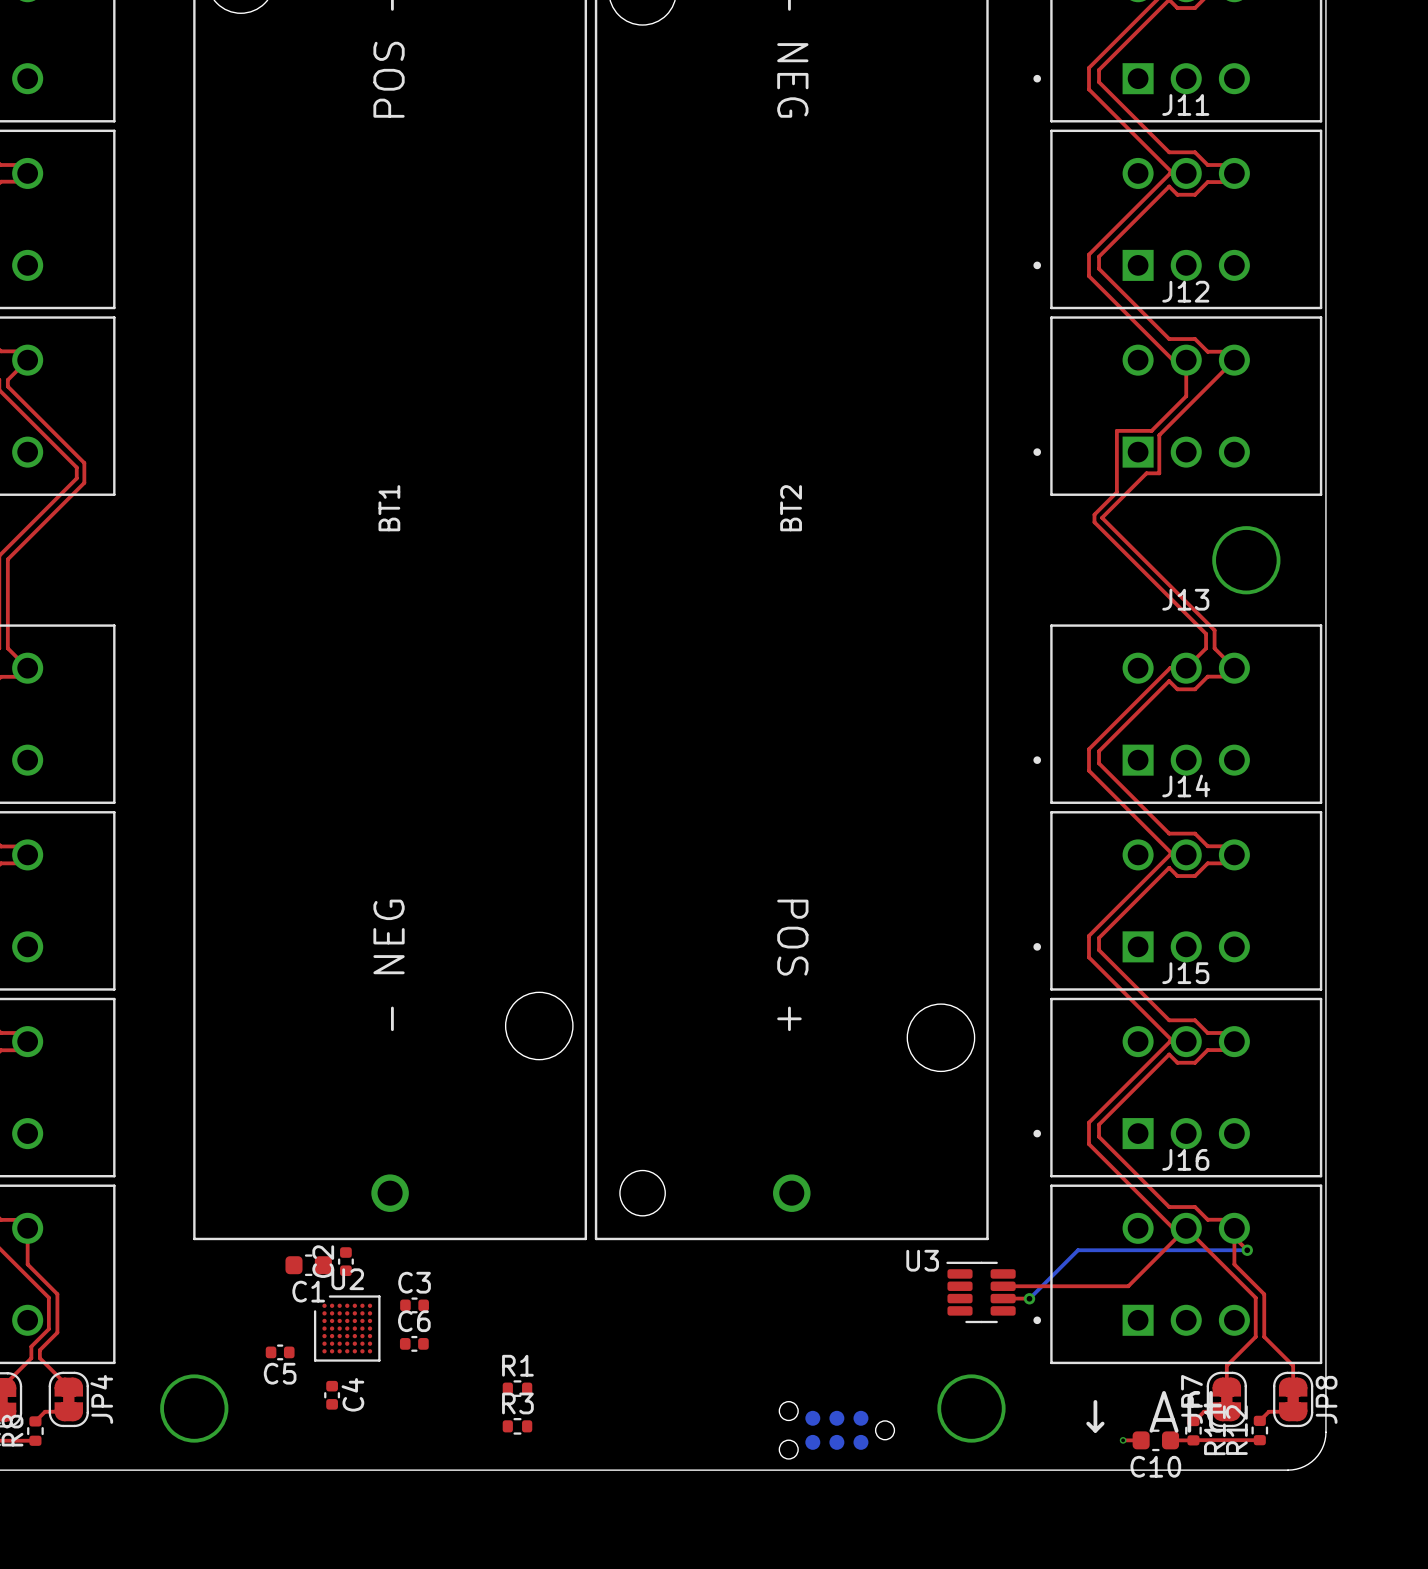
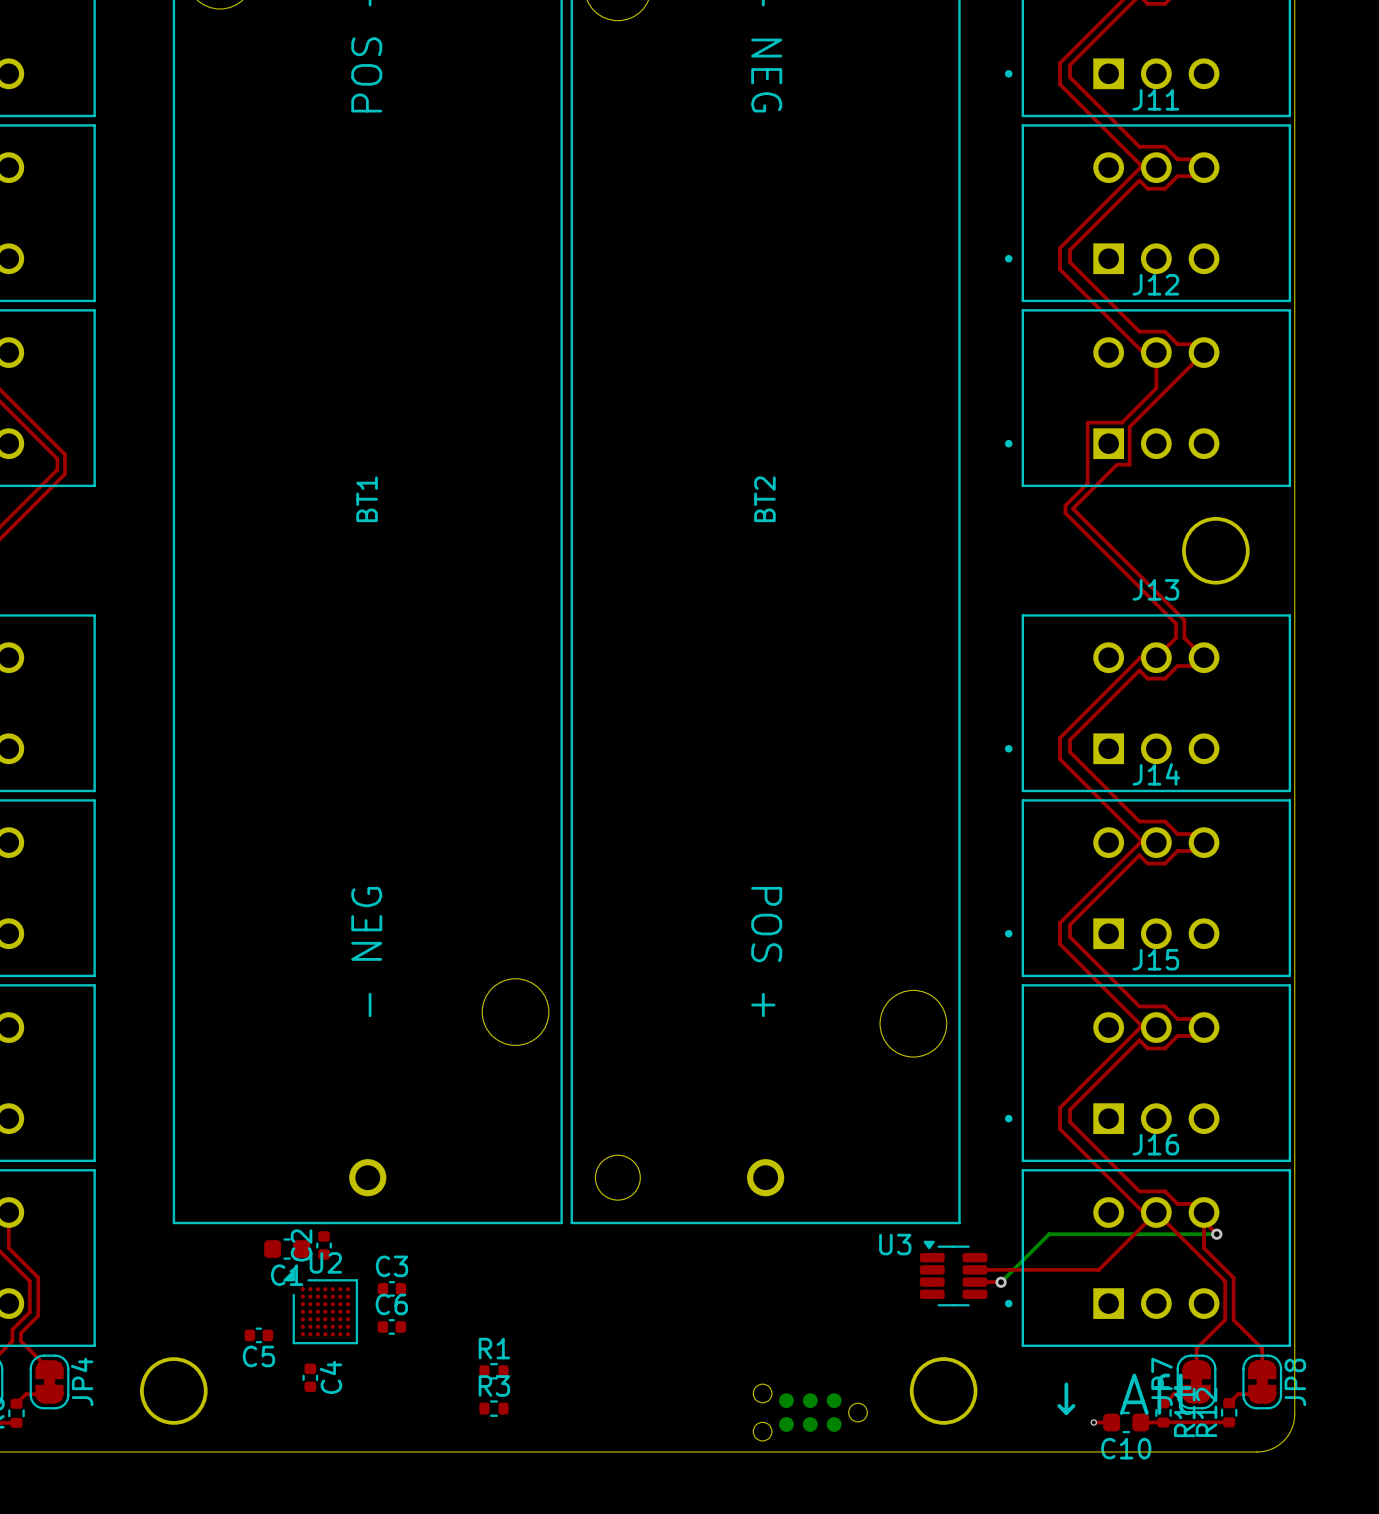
U3 footprint: [946, 1261, 1016, 1324] -> [919, 1240, 988, 1307]
U2 footprint: [313, 1295, 381, 1362] -> [283, 1269, 359, 1345]

